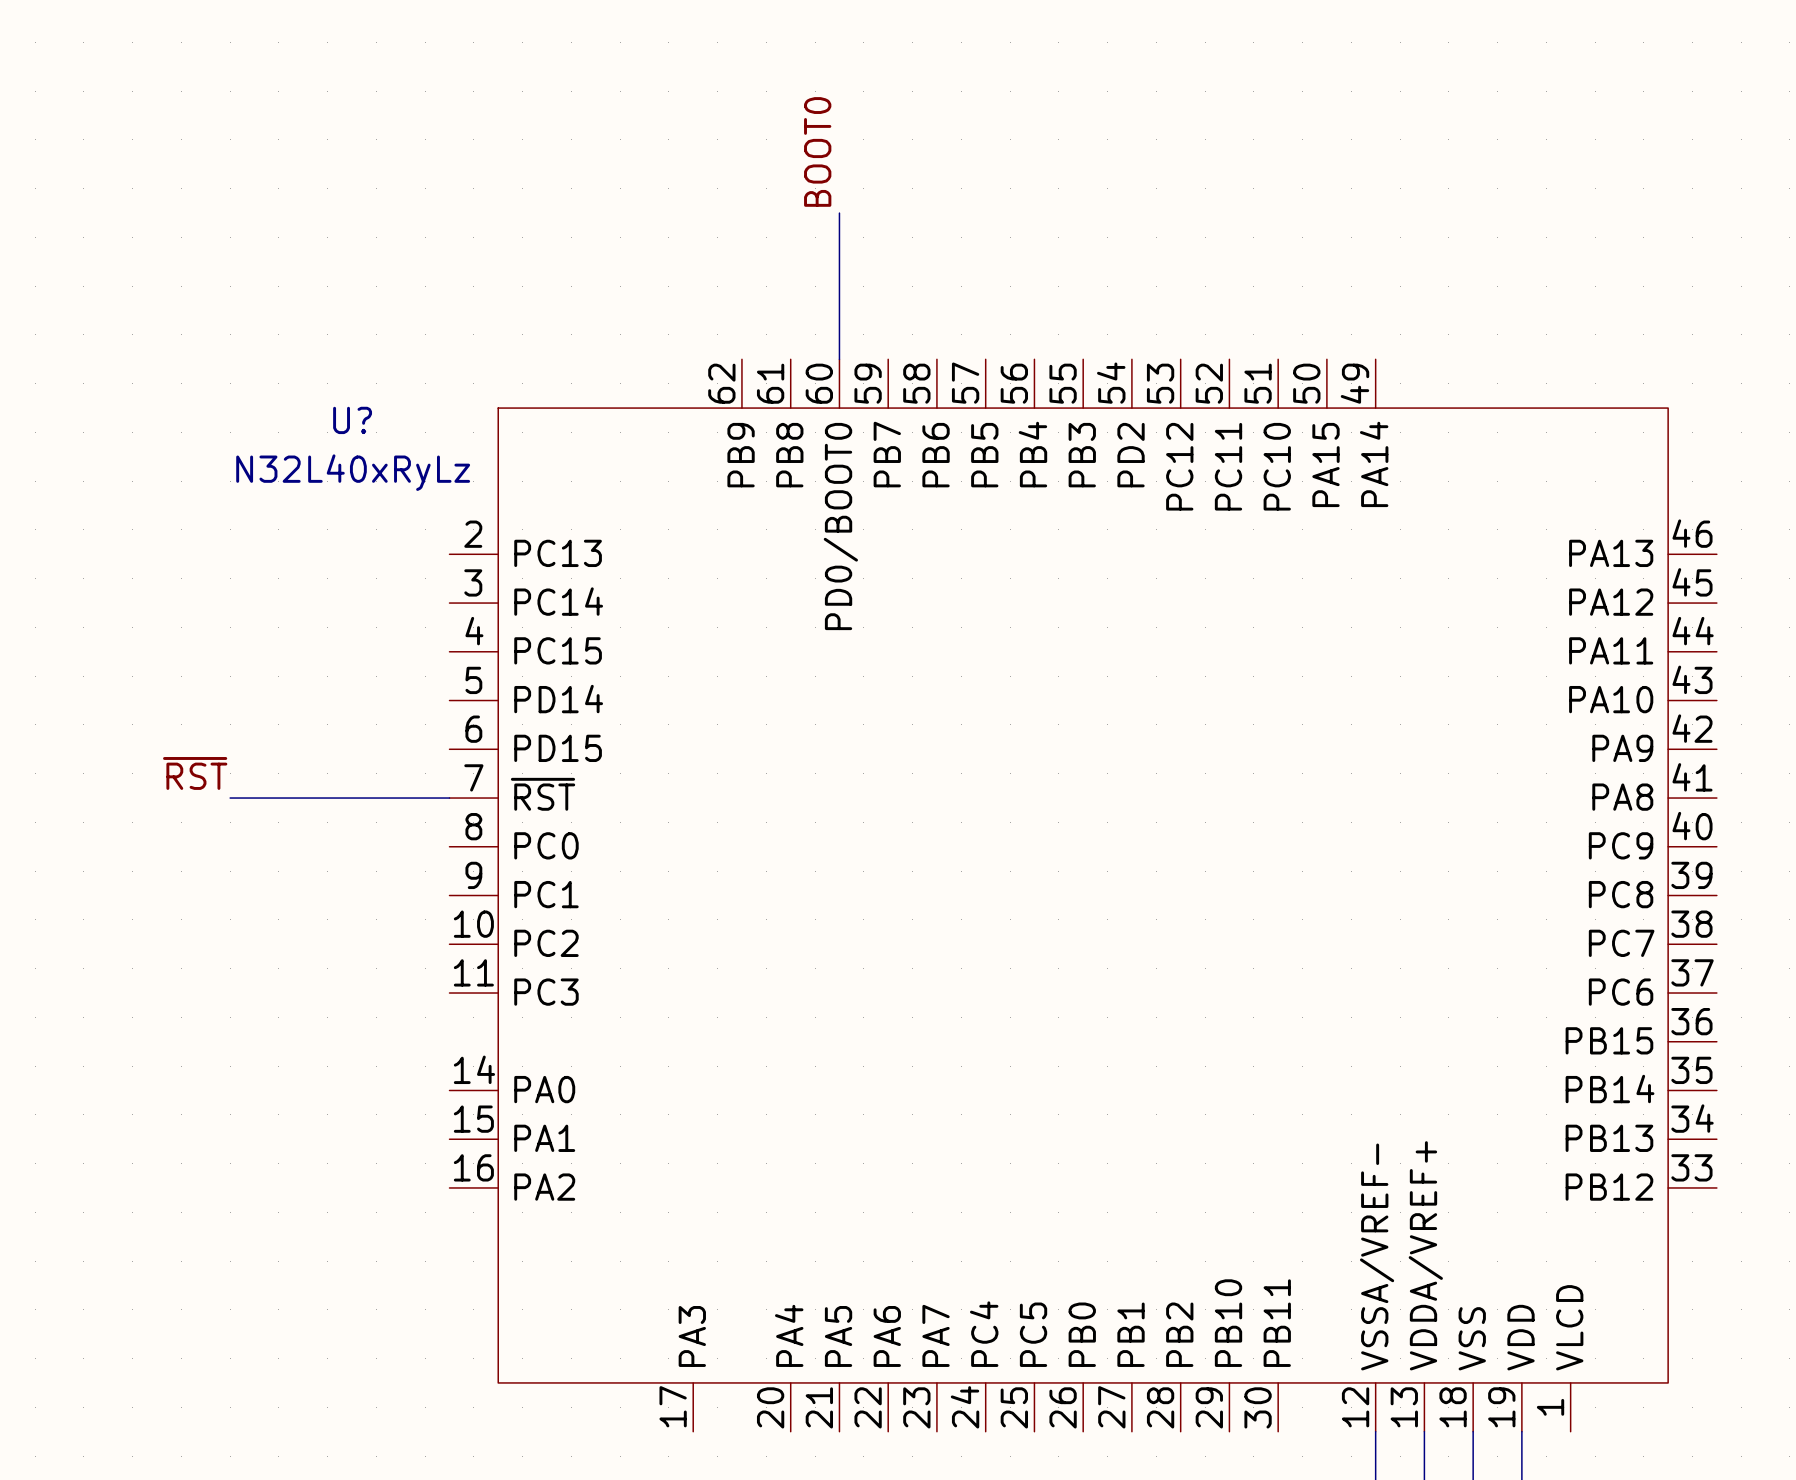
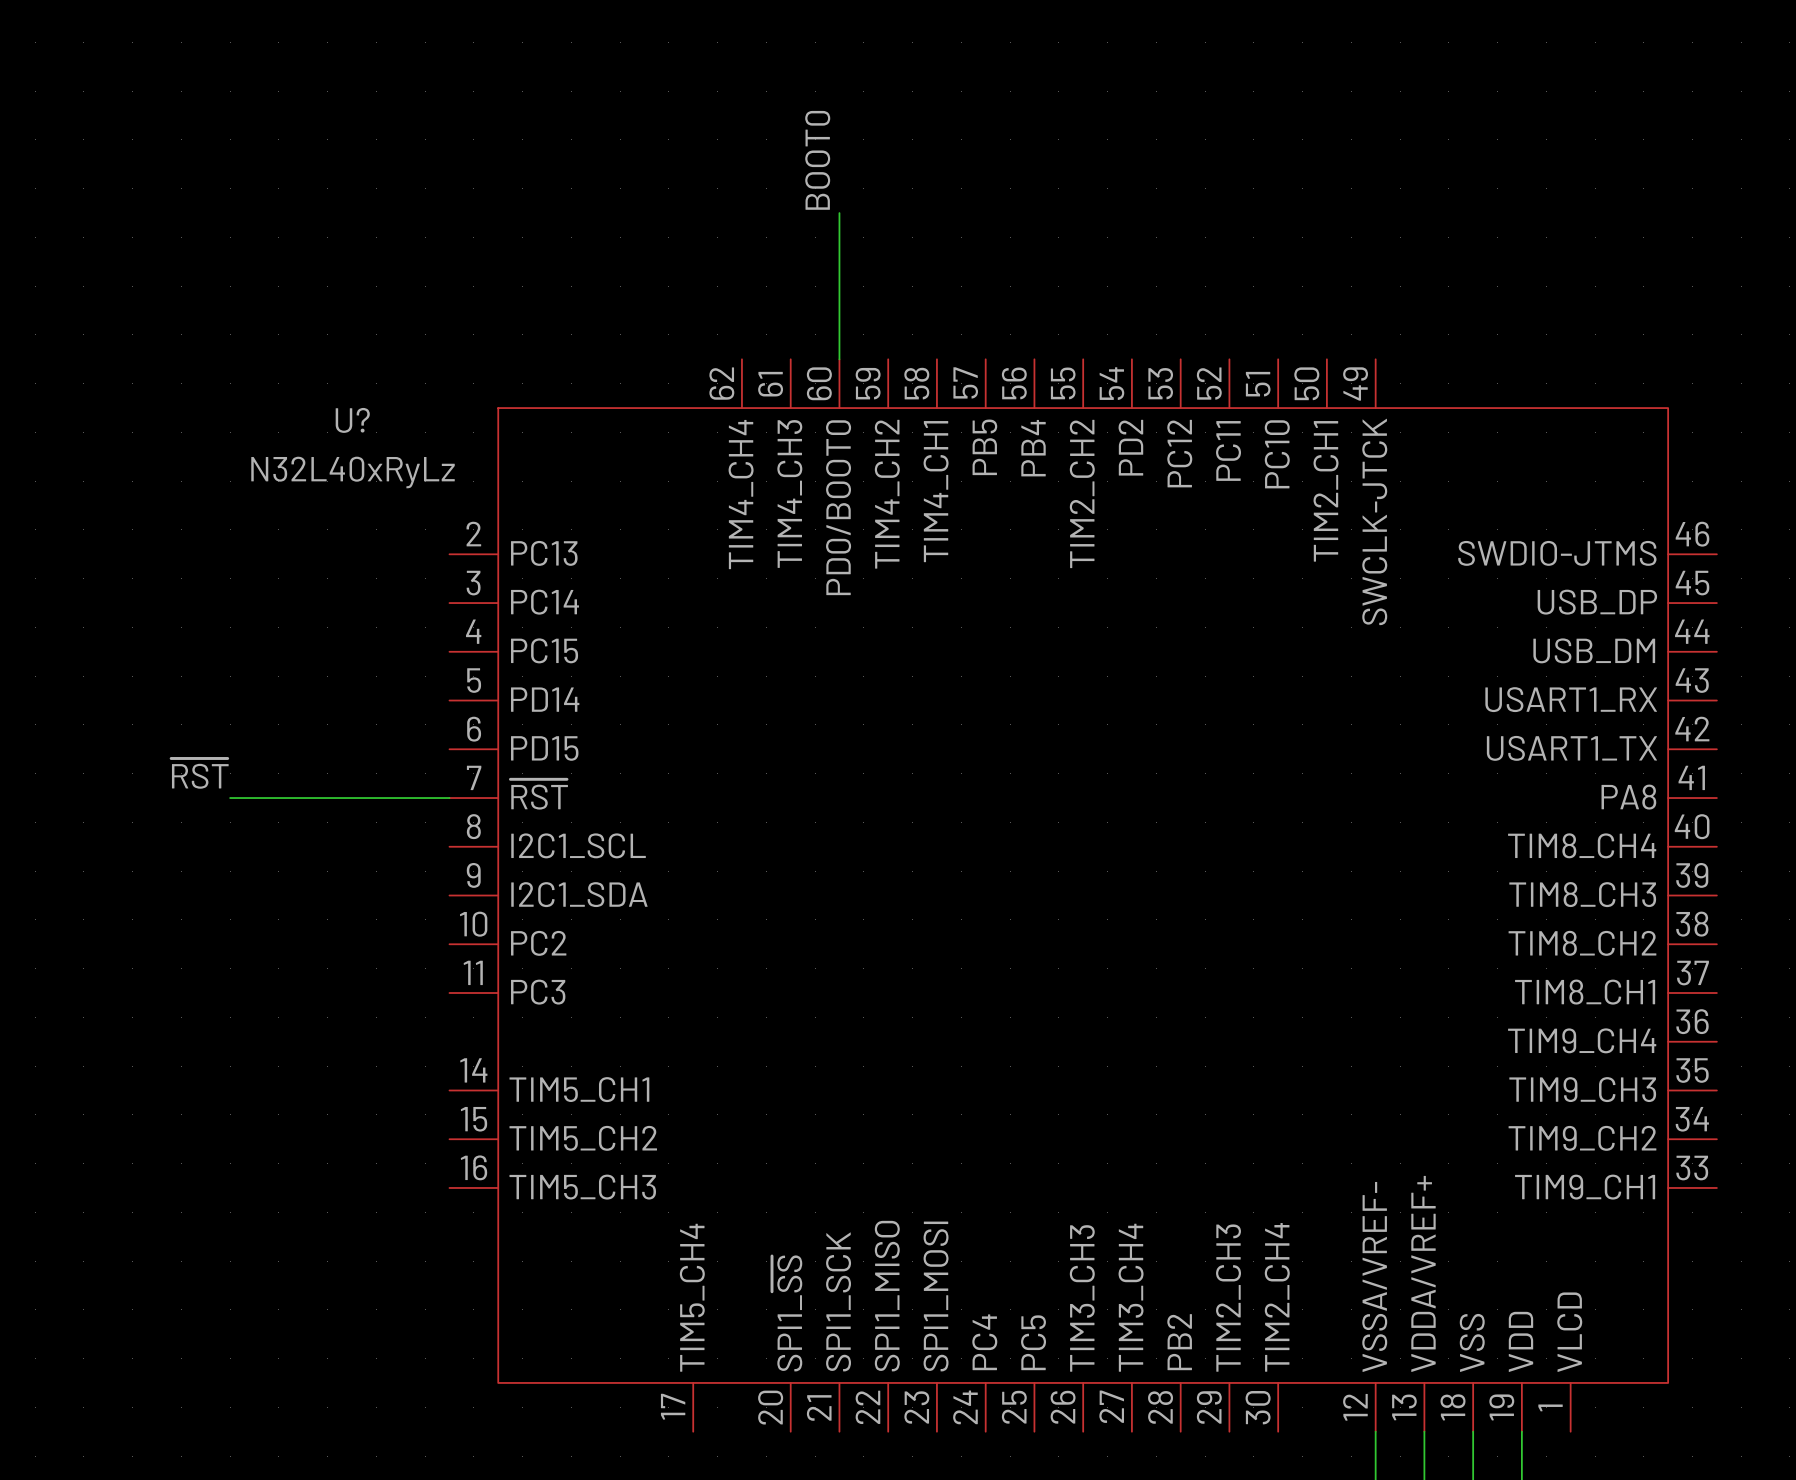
U? symbol: [449, 359, 1717, 1432] -> [449, 359, 1717, 1432]

